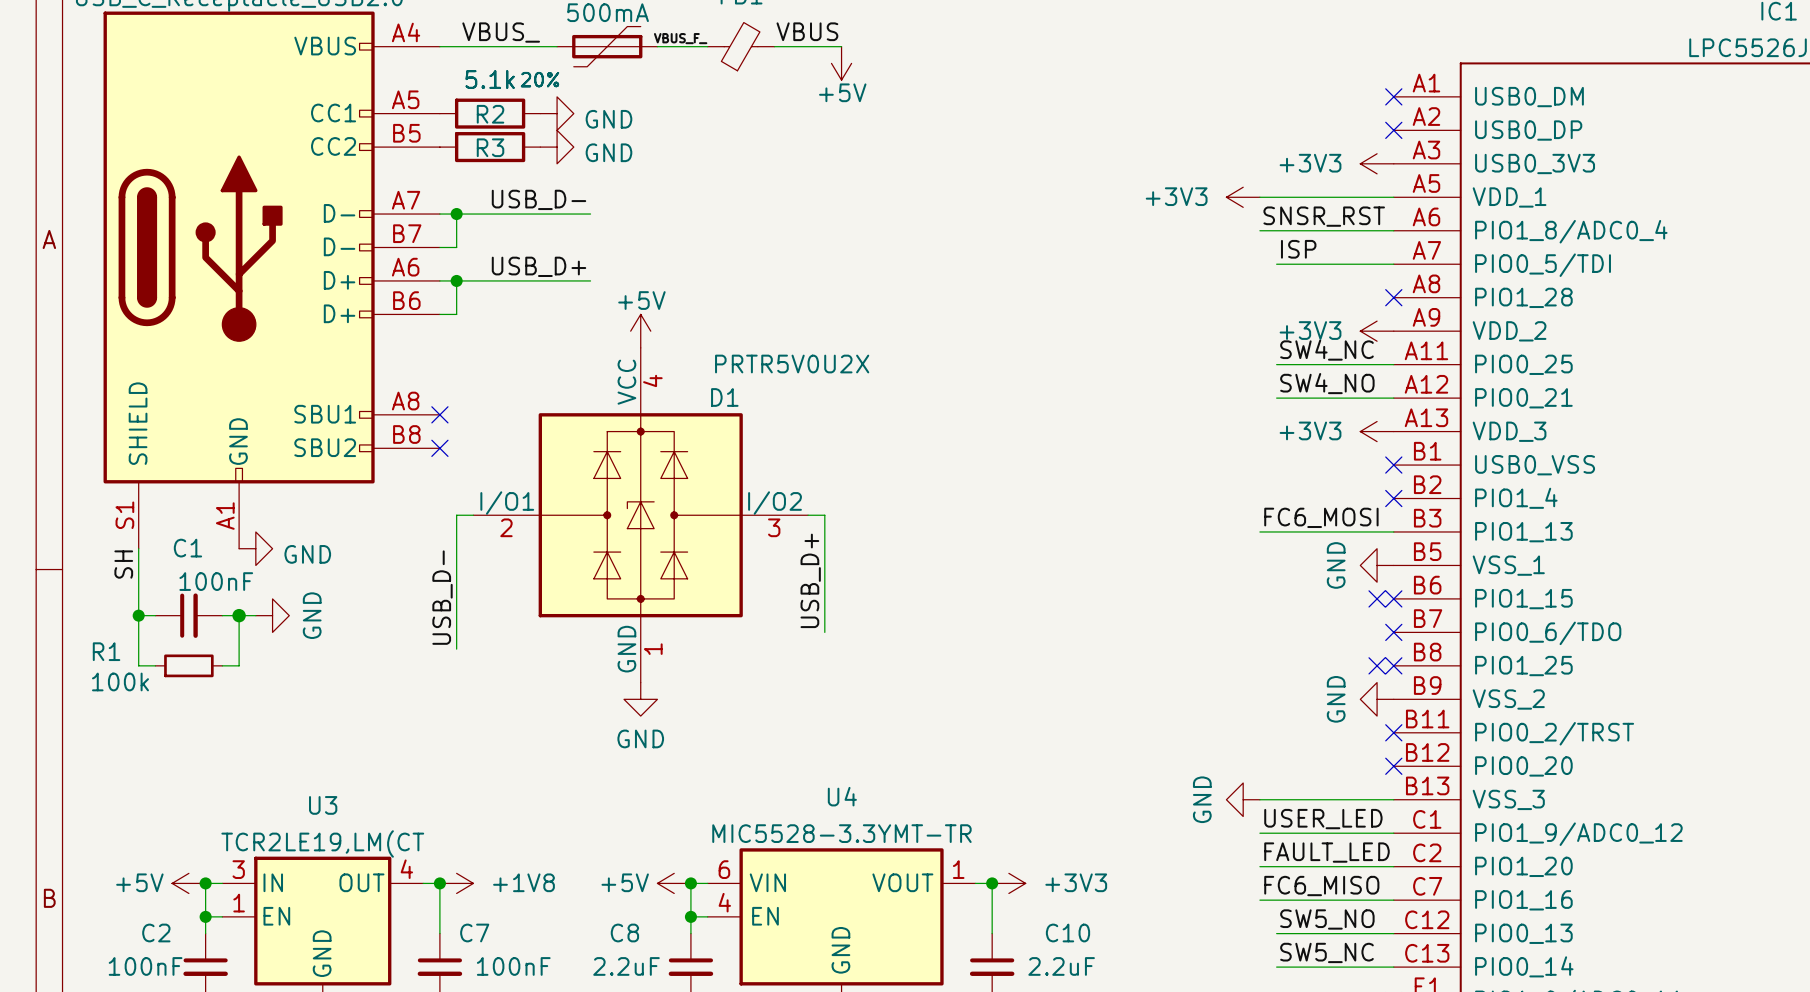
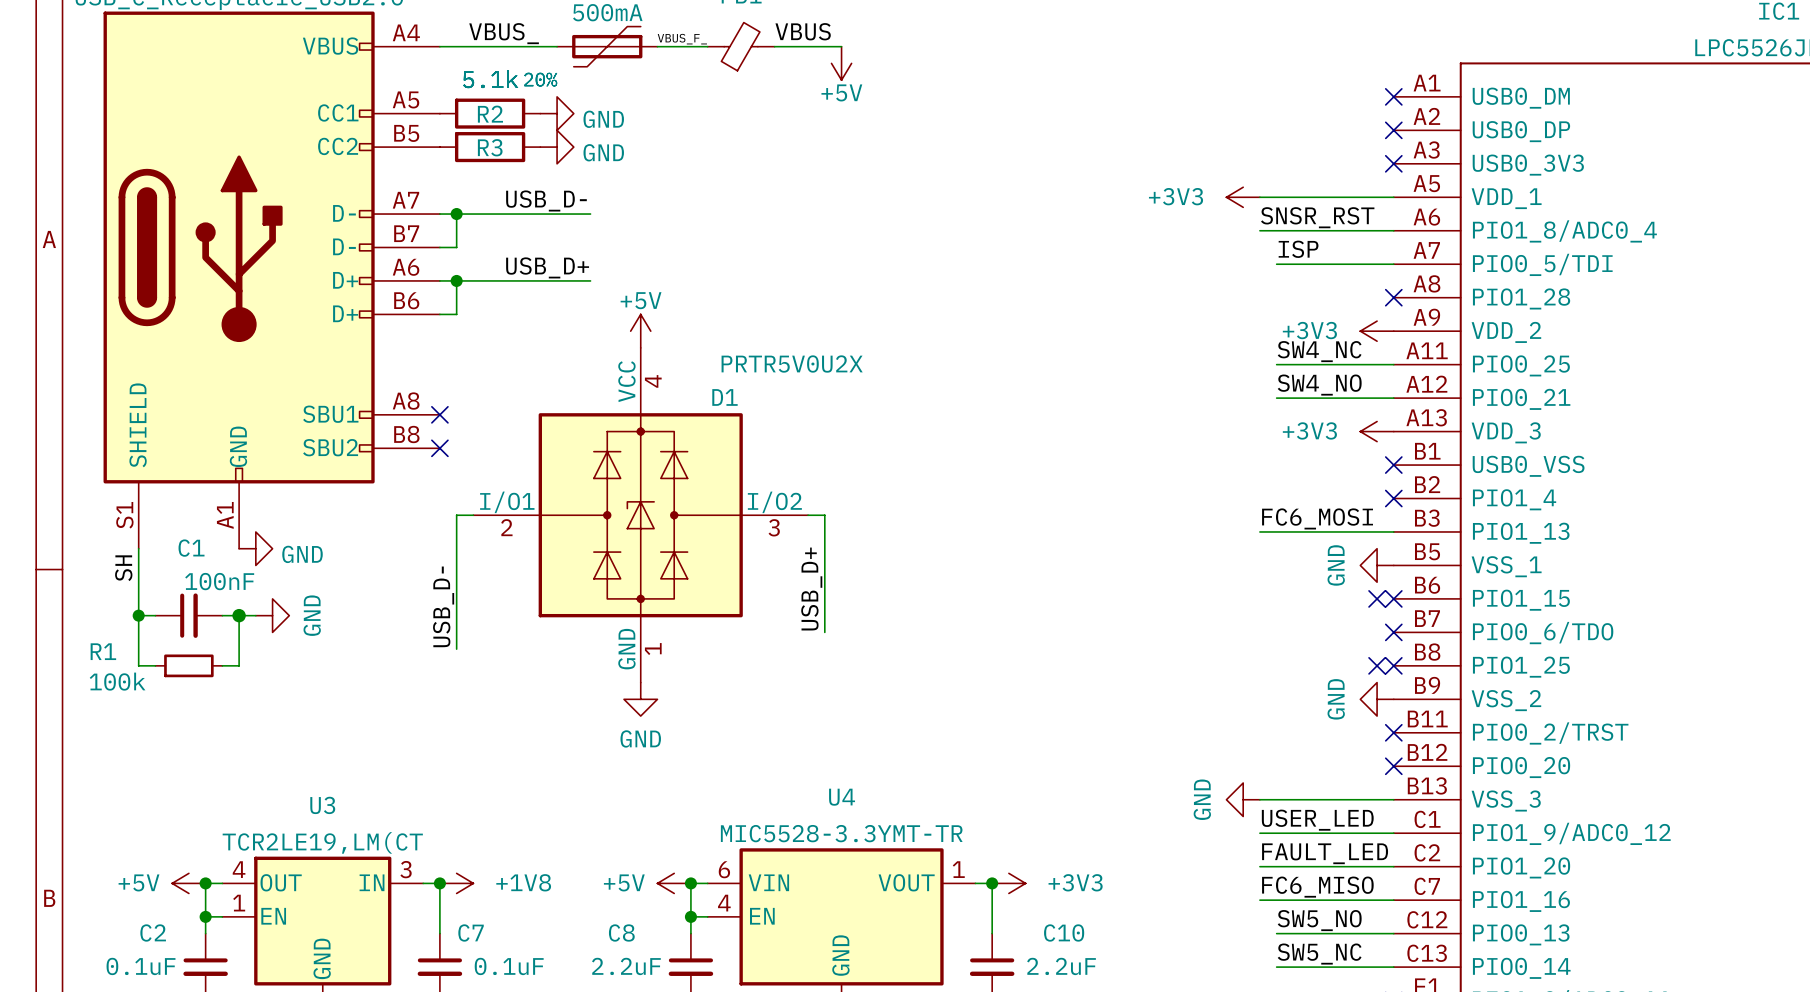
power symbol: +3V3 (1377, 163) -> none
no-connect mark: none -> (1393, 163)
U3 pin number: 3 (238, 869) -> 4 (239, 869)
U3 pin number: 4 (406, 869) -> 3 (406, 869)
U3 pin name: IN (273, 882) -> OUT (281, 882)
U3 pin name: OUT (361, 882) -> IN (372, 882)
C2 value: 100nF (145, 966) -> 0.1uF (141, 966)
C7 value: 100nF (513, 966) -> 0.1uF (509, 966)

